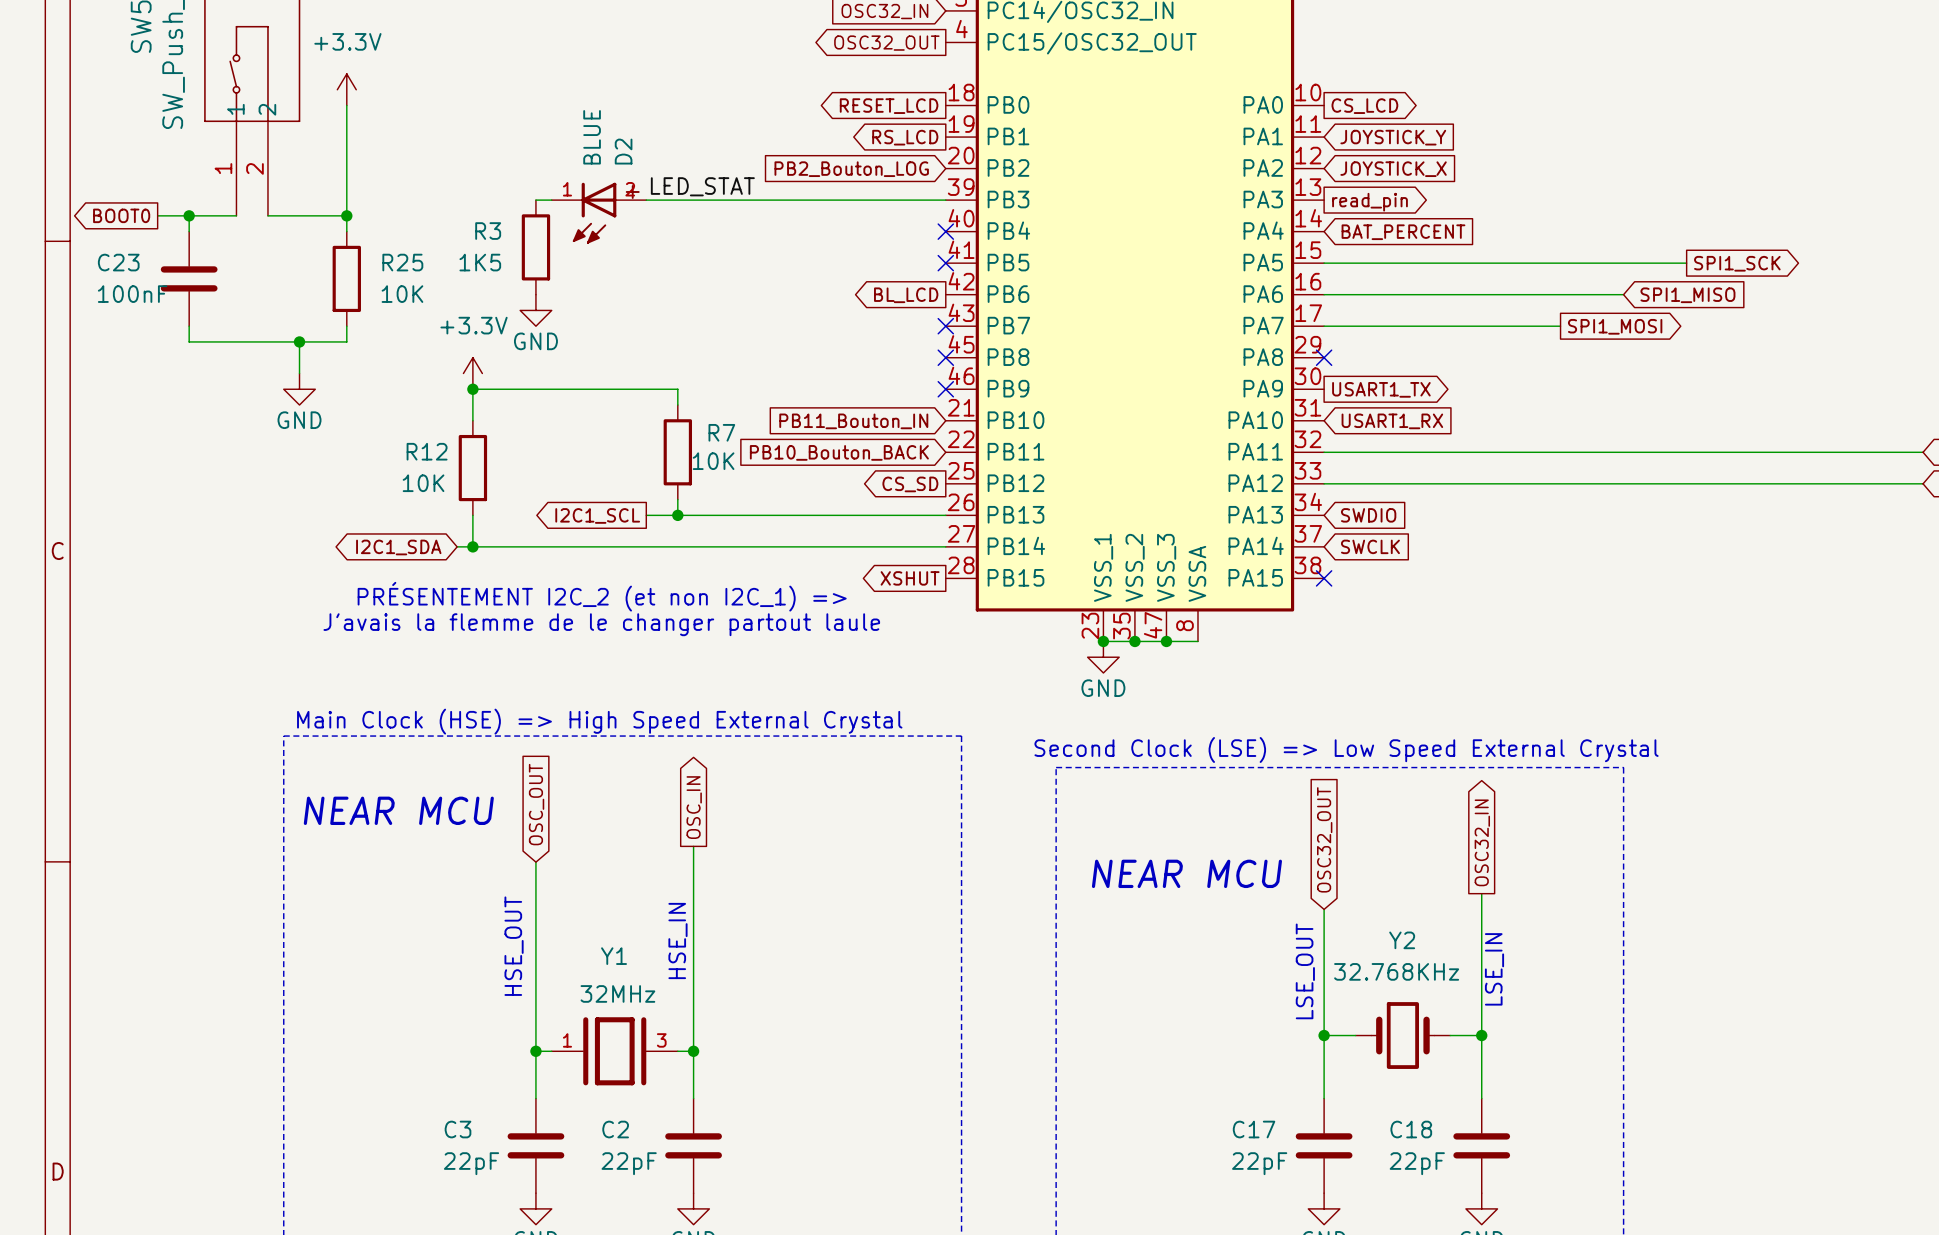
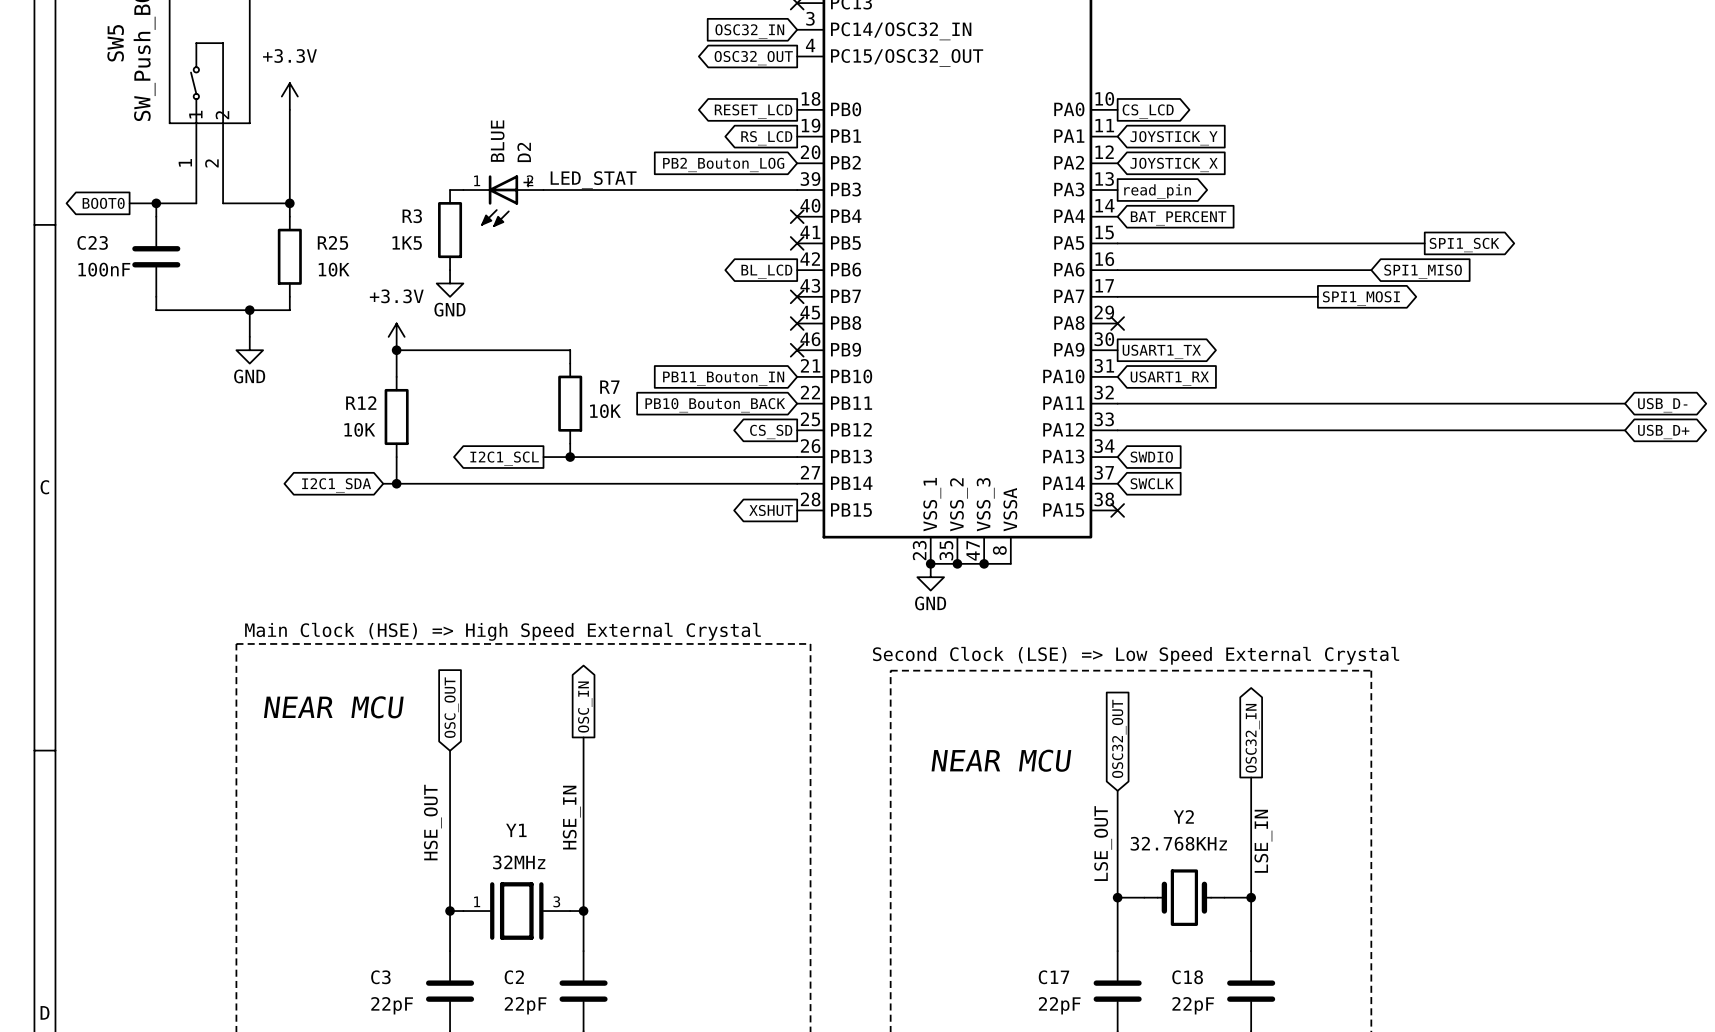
text: PRÉSENTEMENT I2C_2 (et non I2C_1) => (602, 596) -> none
text: J'avais la flemme de le changer partout laule (601, 624) -> none

